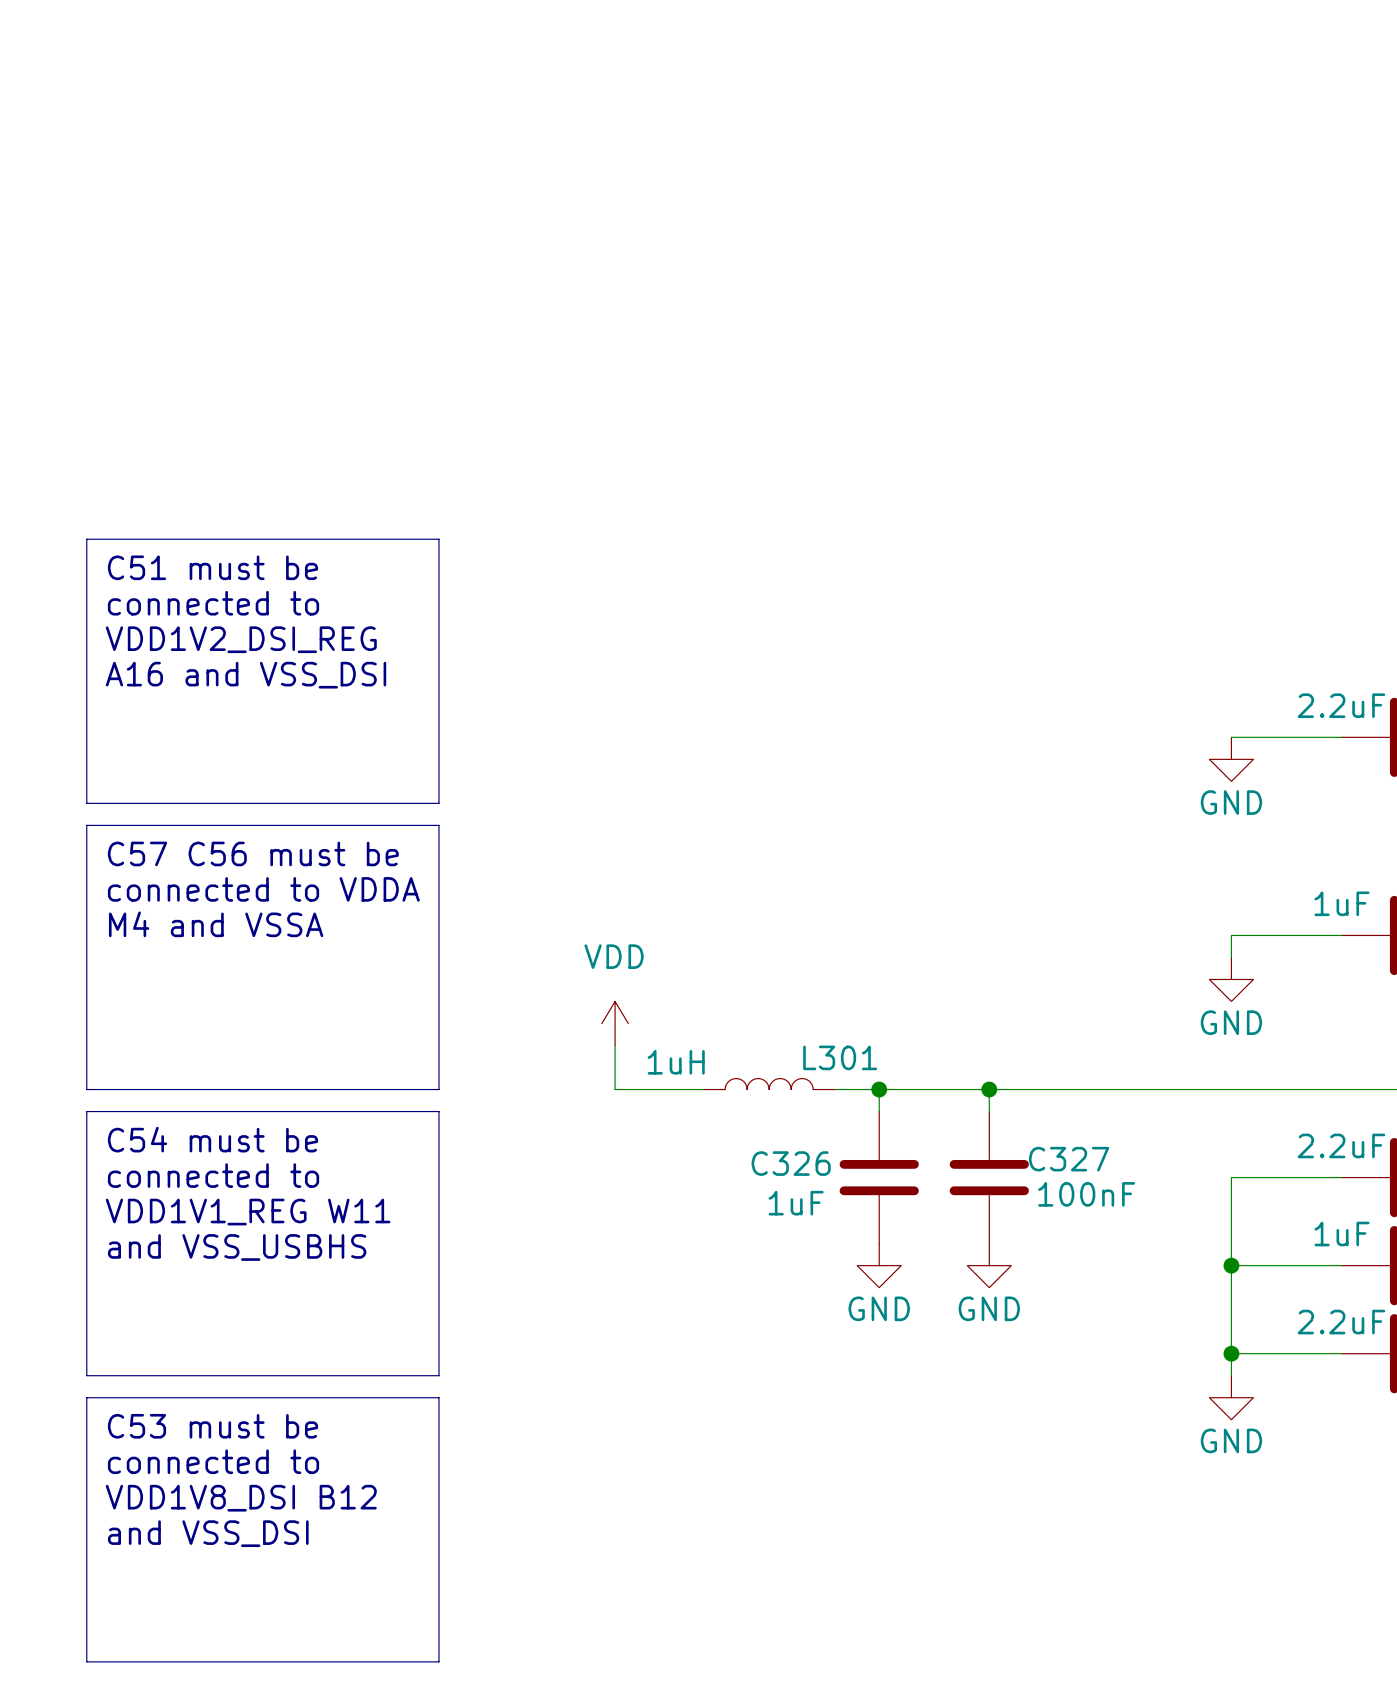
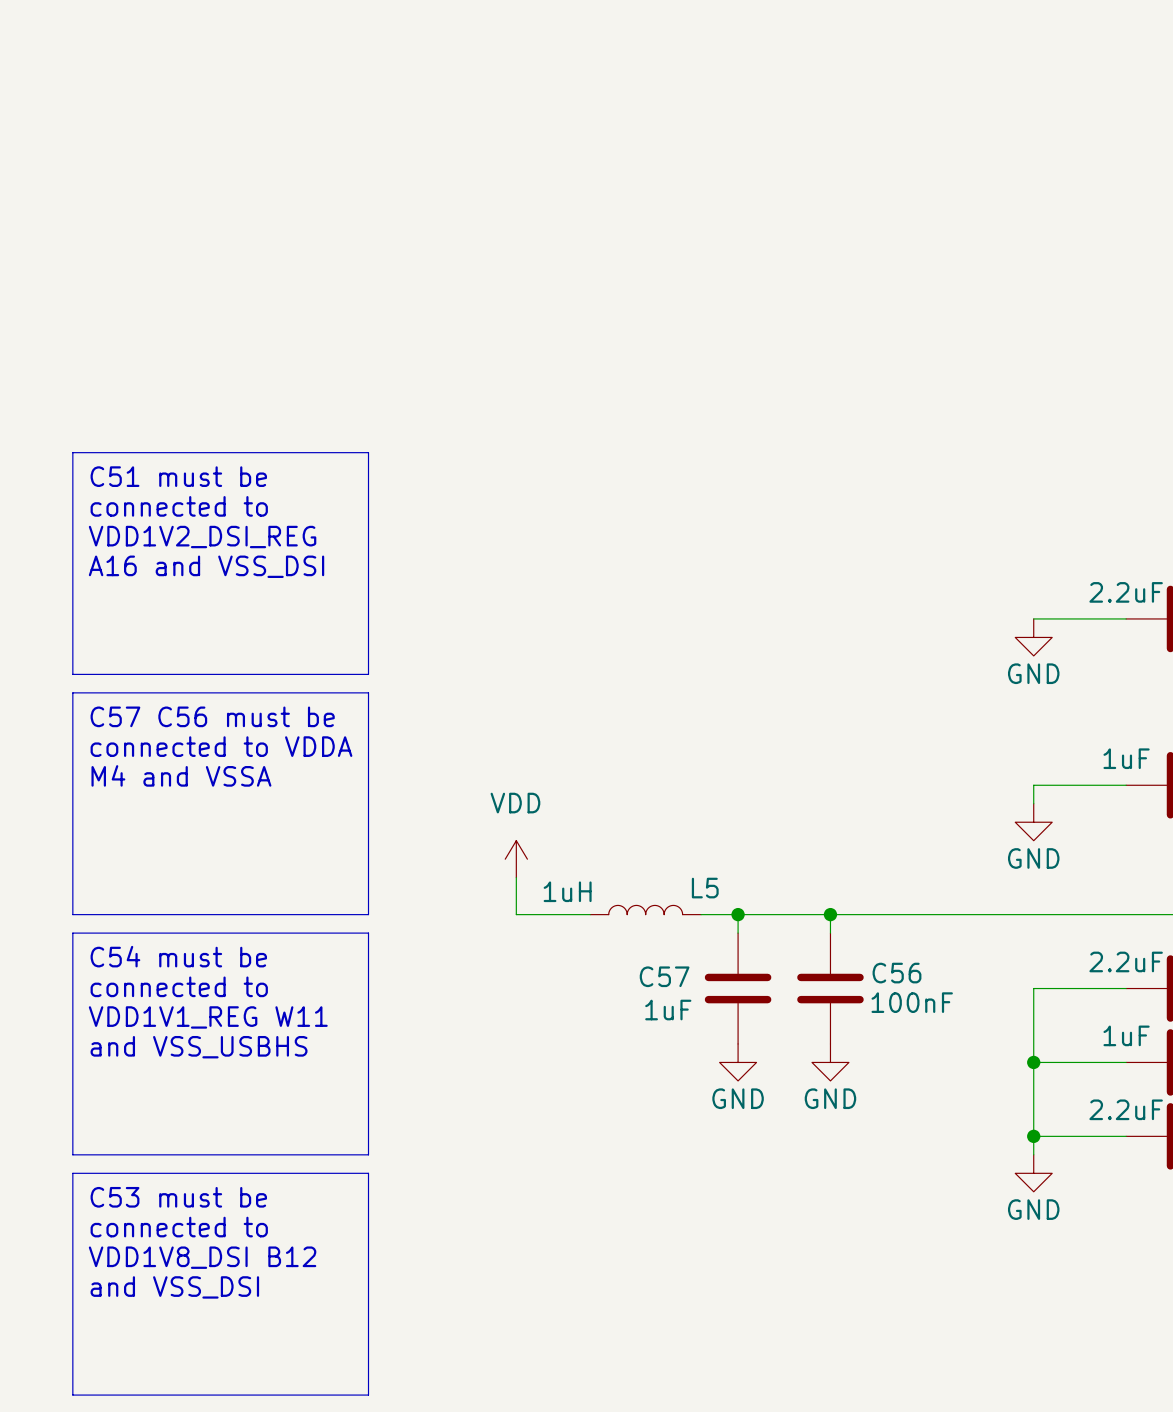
L301 name: L301 (840, 1057) -> L5 (705, 888)
C327 name: C327 (1069, 1159) -> C56 (896, 973)
C326 name: C326 (791, 1163) -> C57 (664, 976)

